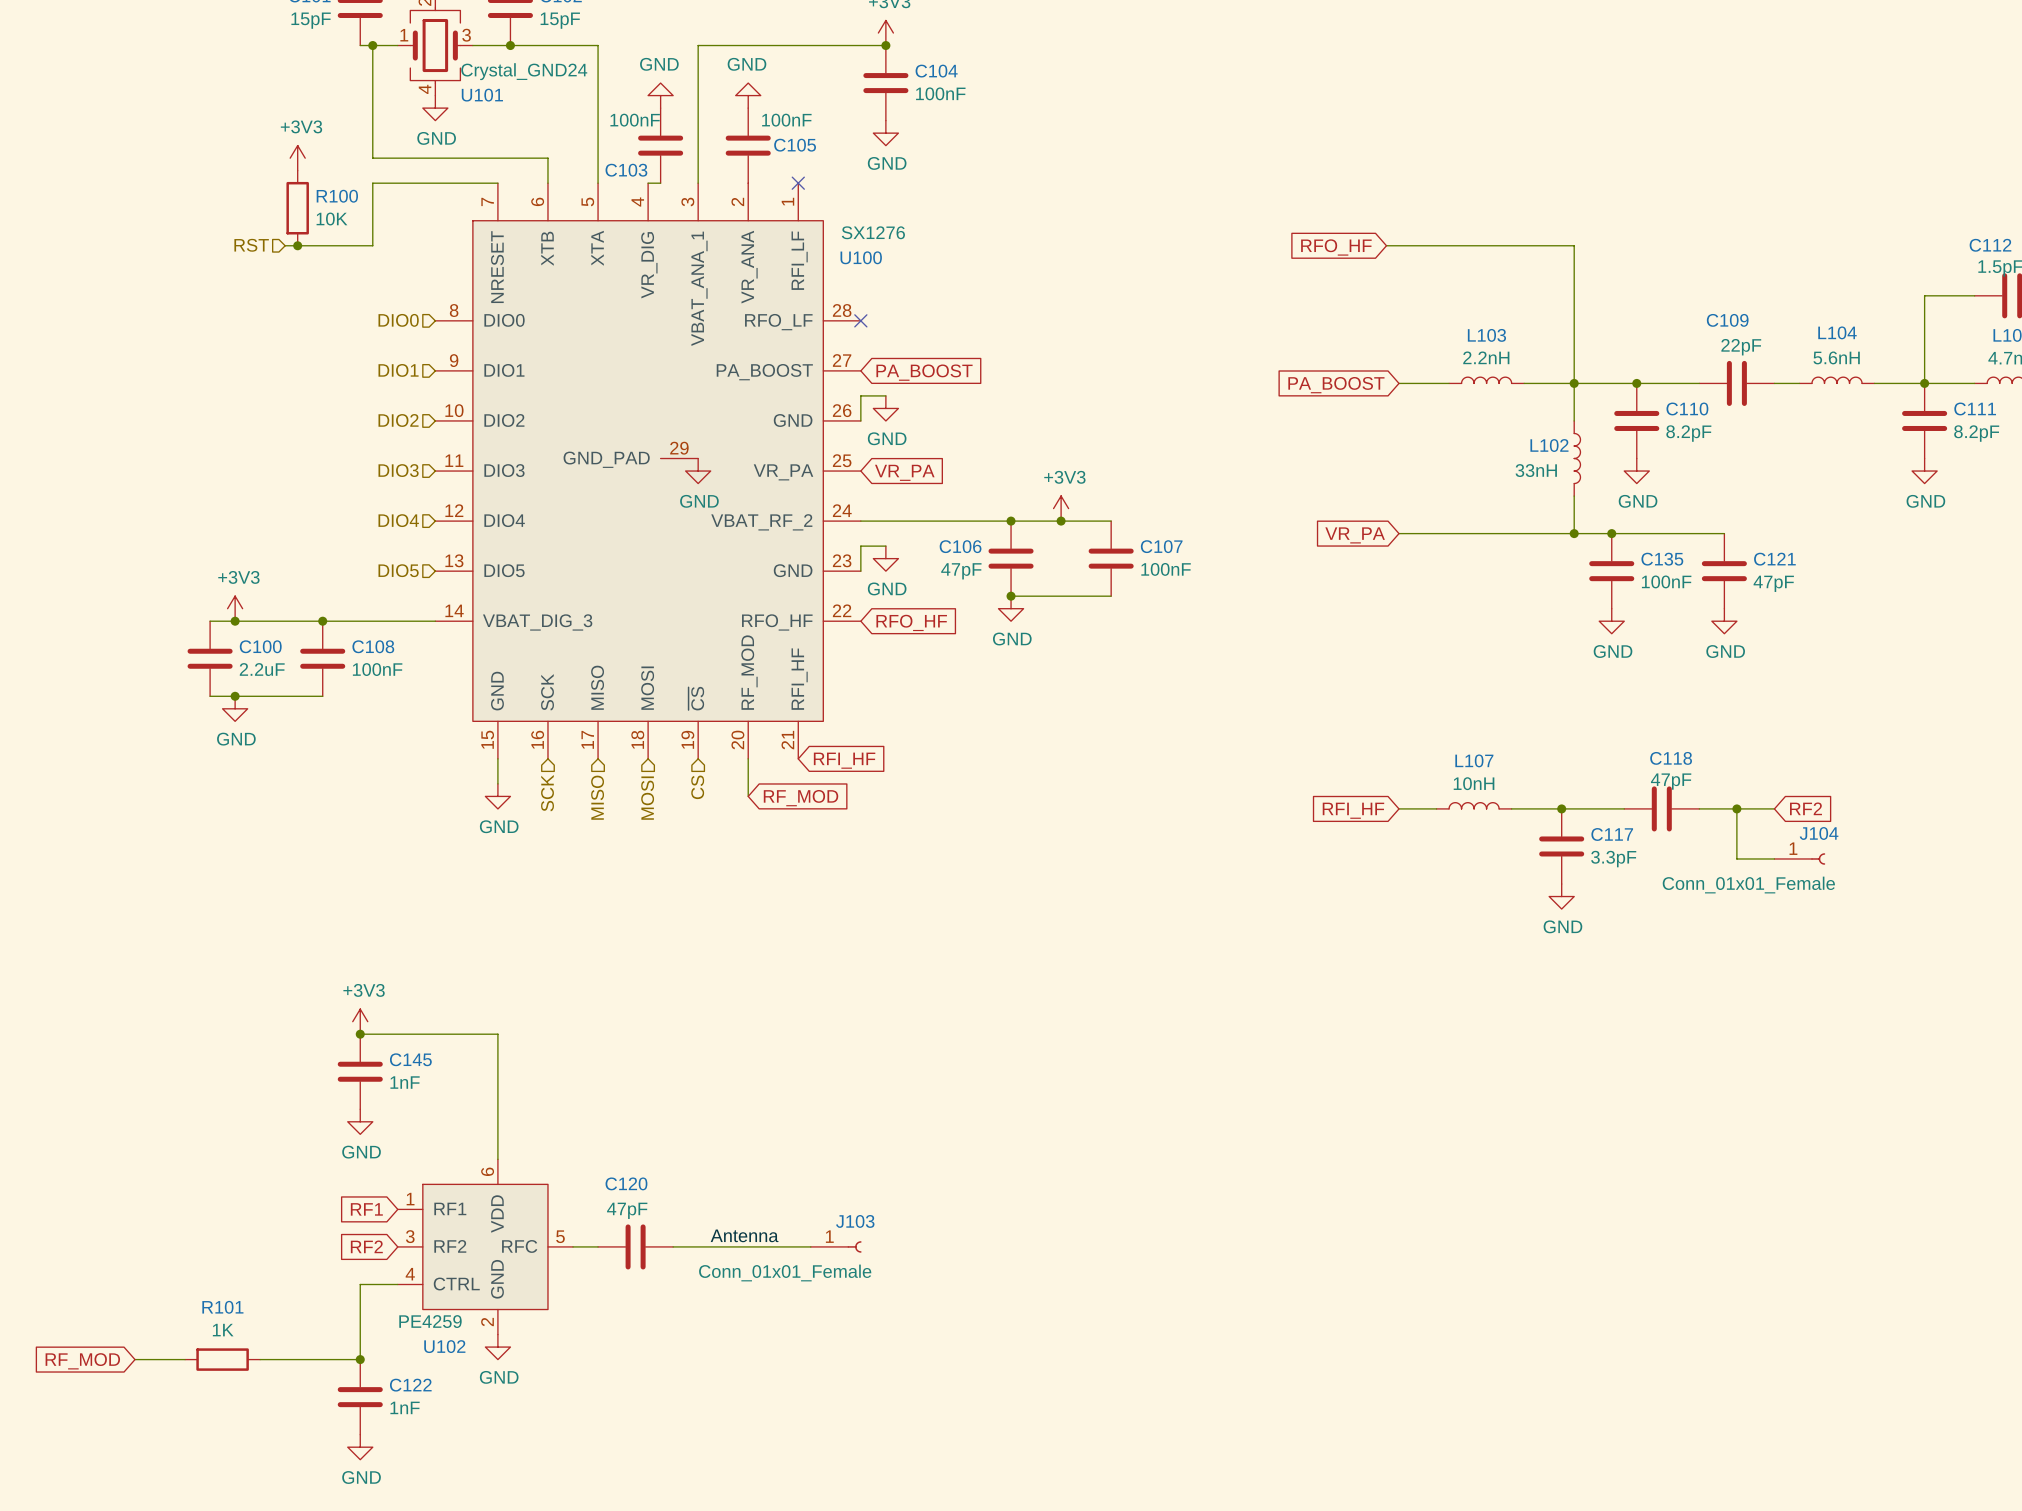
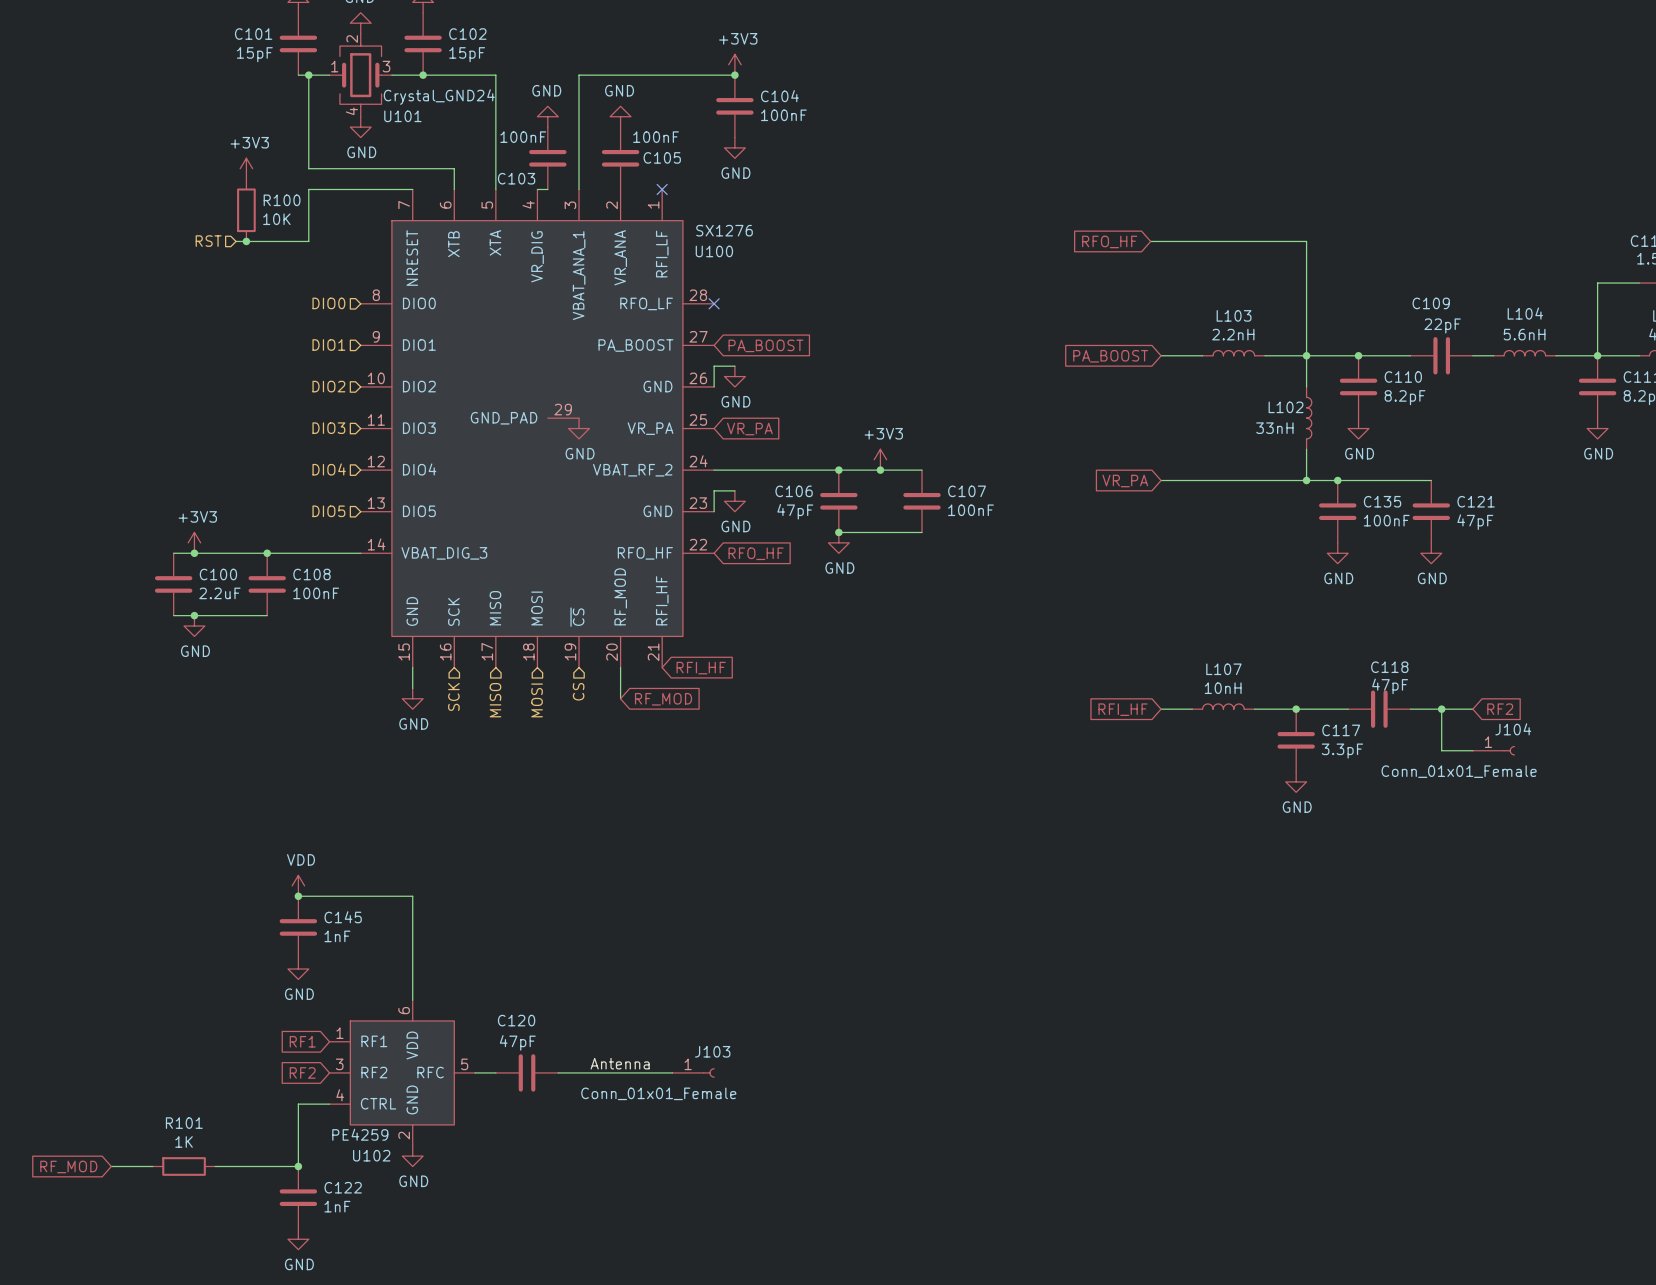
power symbol: +3V3 (360, 1021) -> VDD (298, 885)

